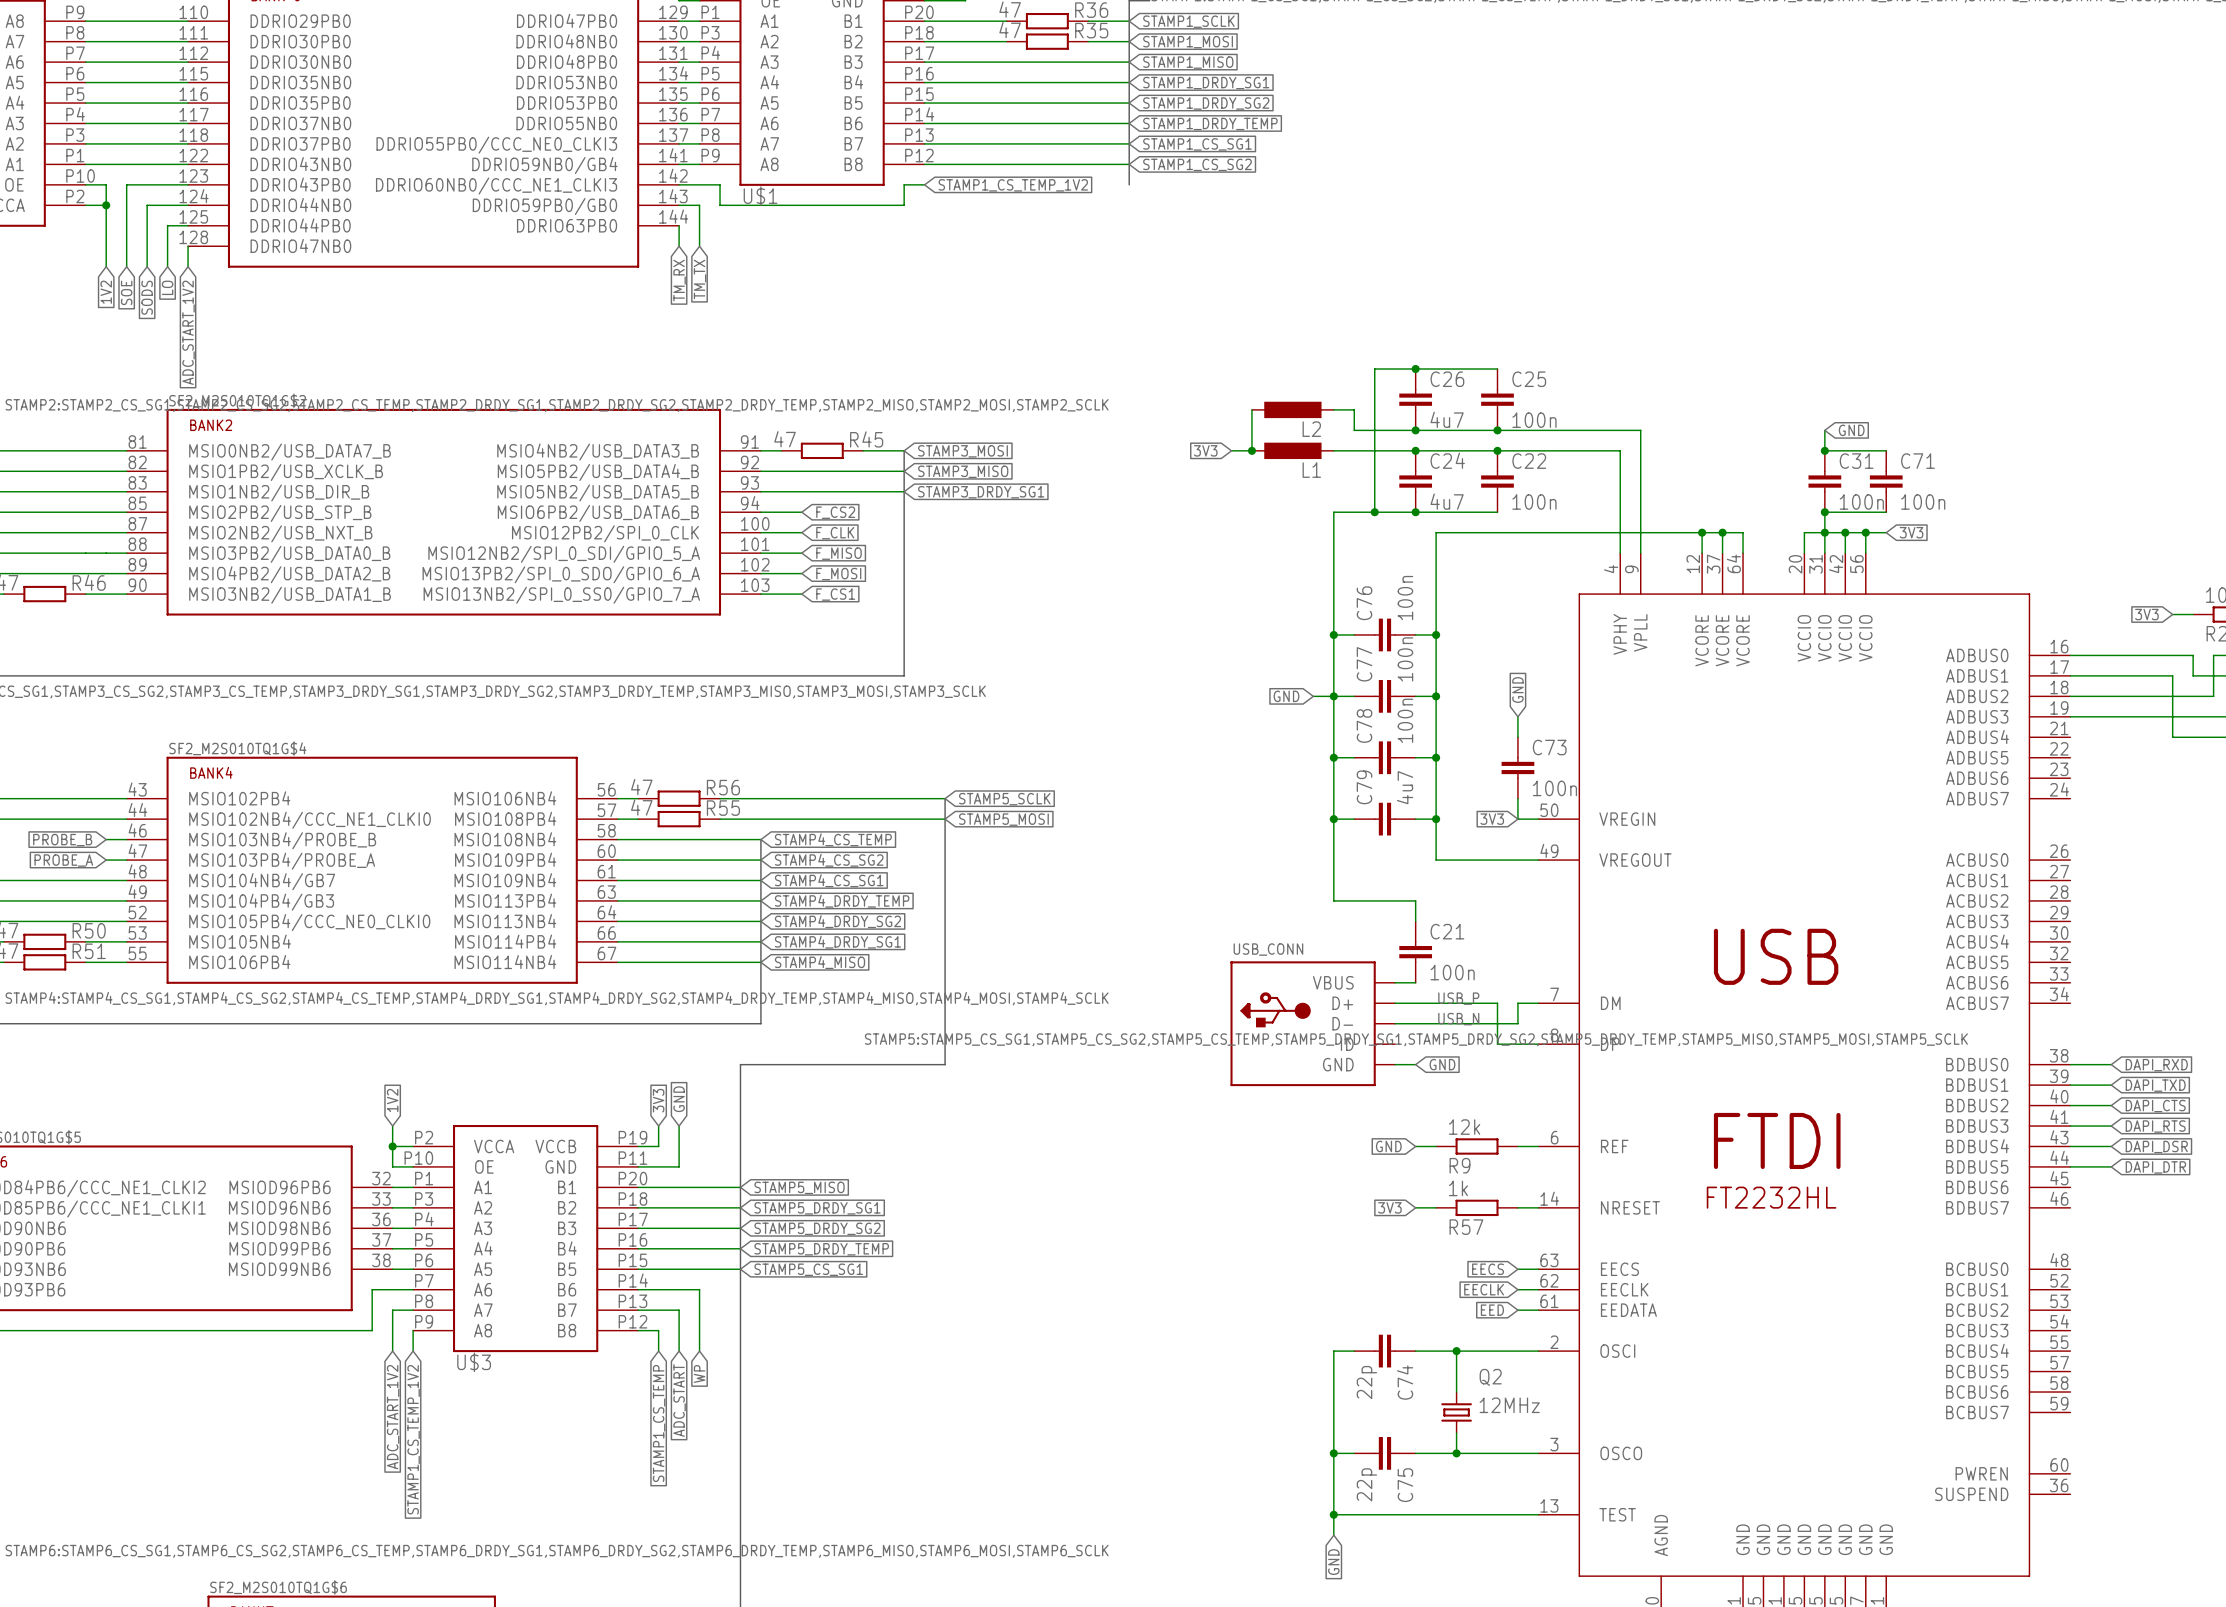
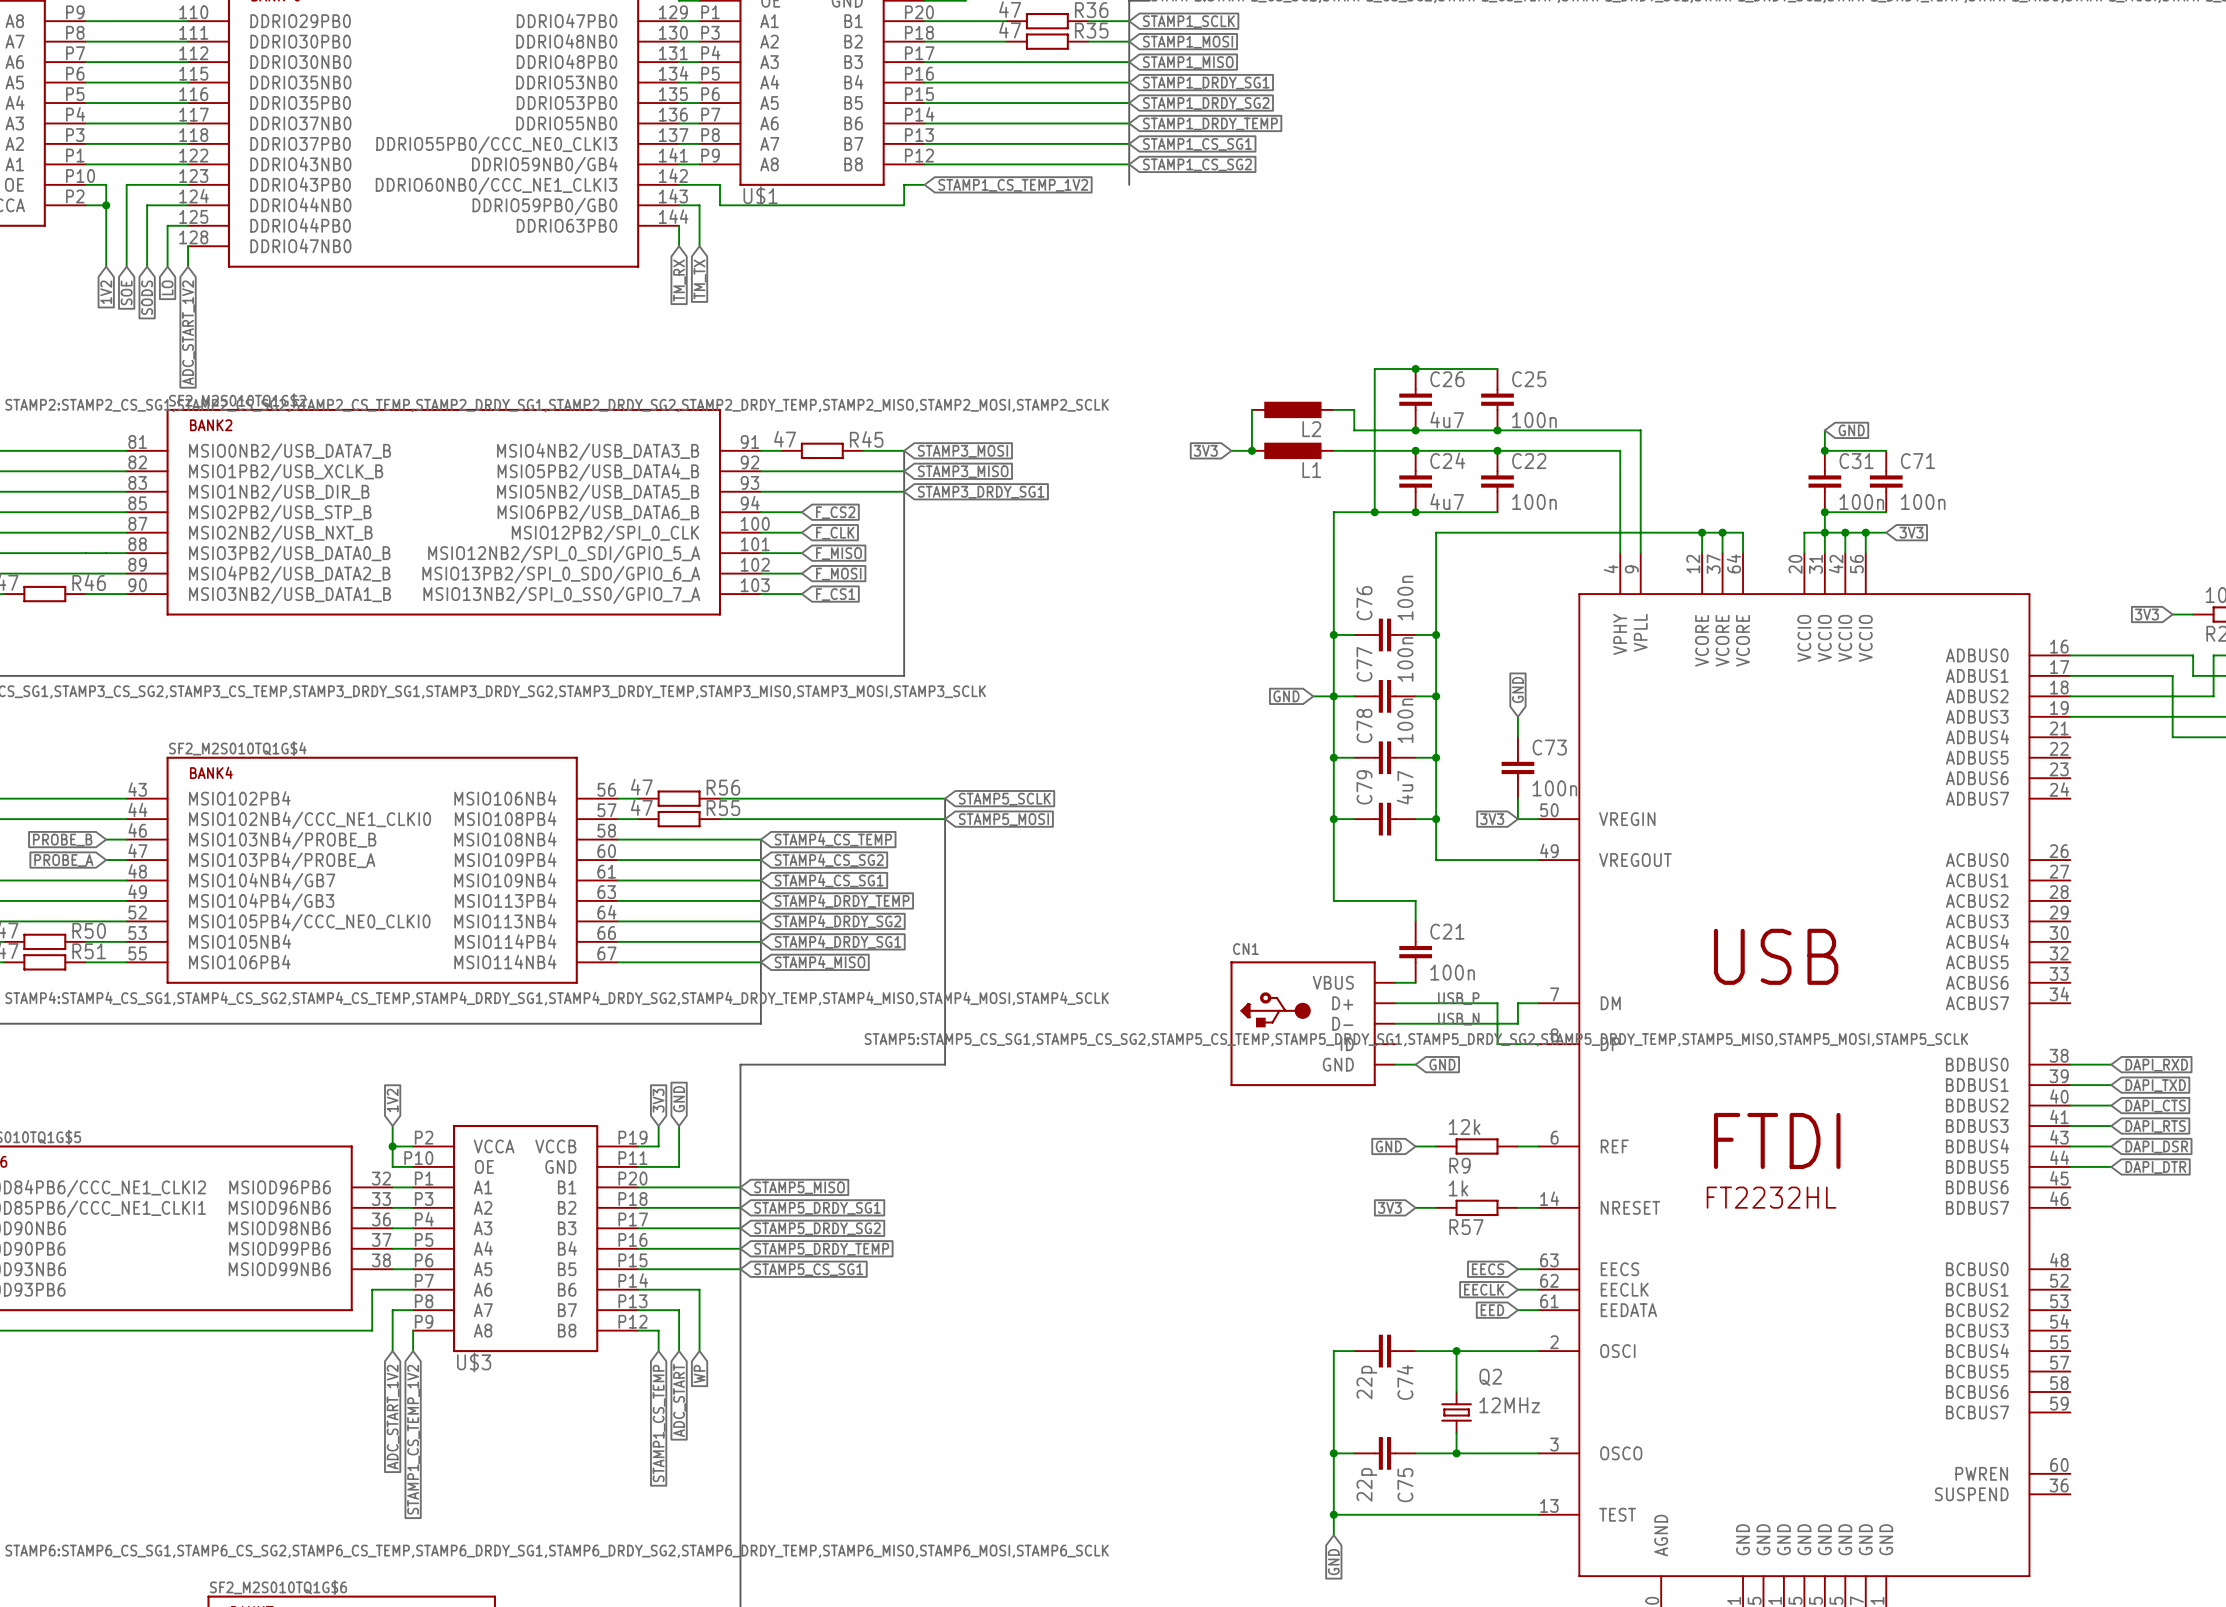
USB_CONN name: USB_CONN (1268, 949) -> CN1 (1245, 949)

